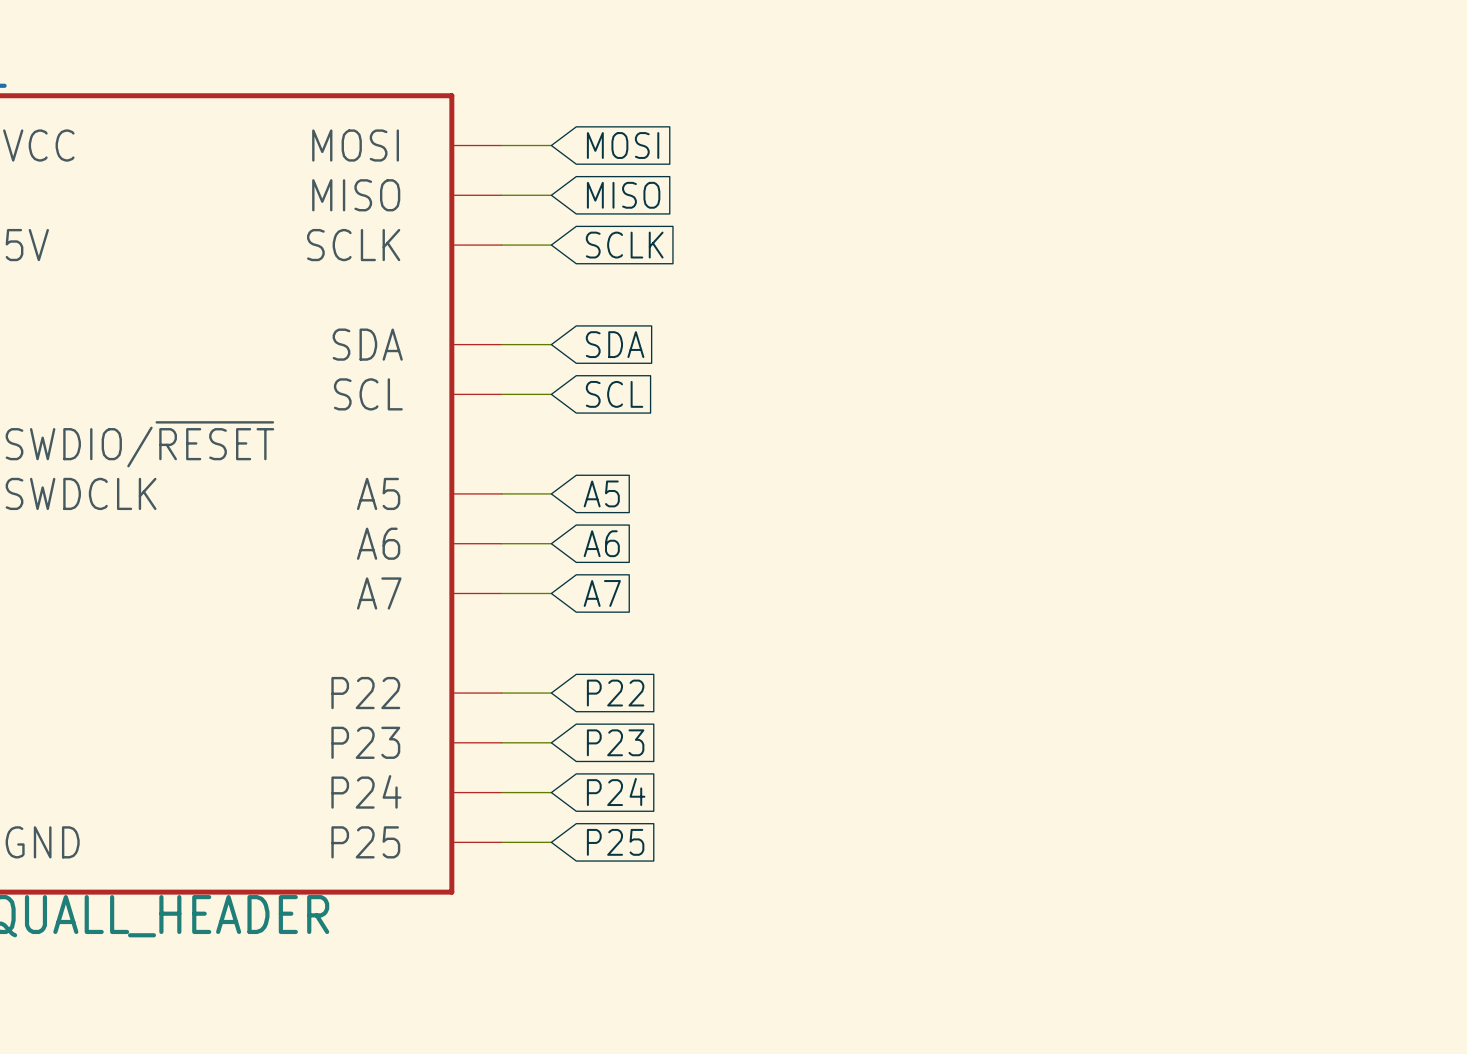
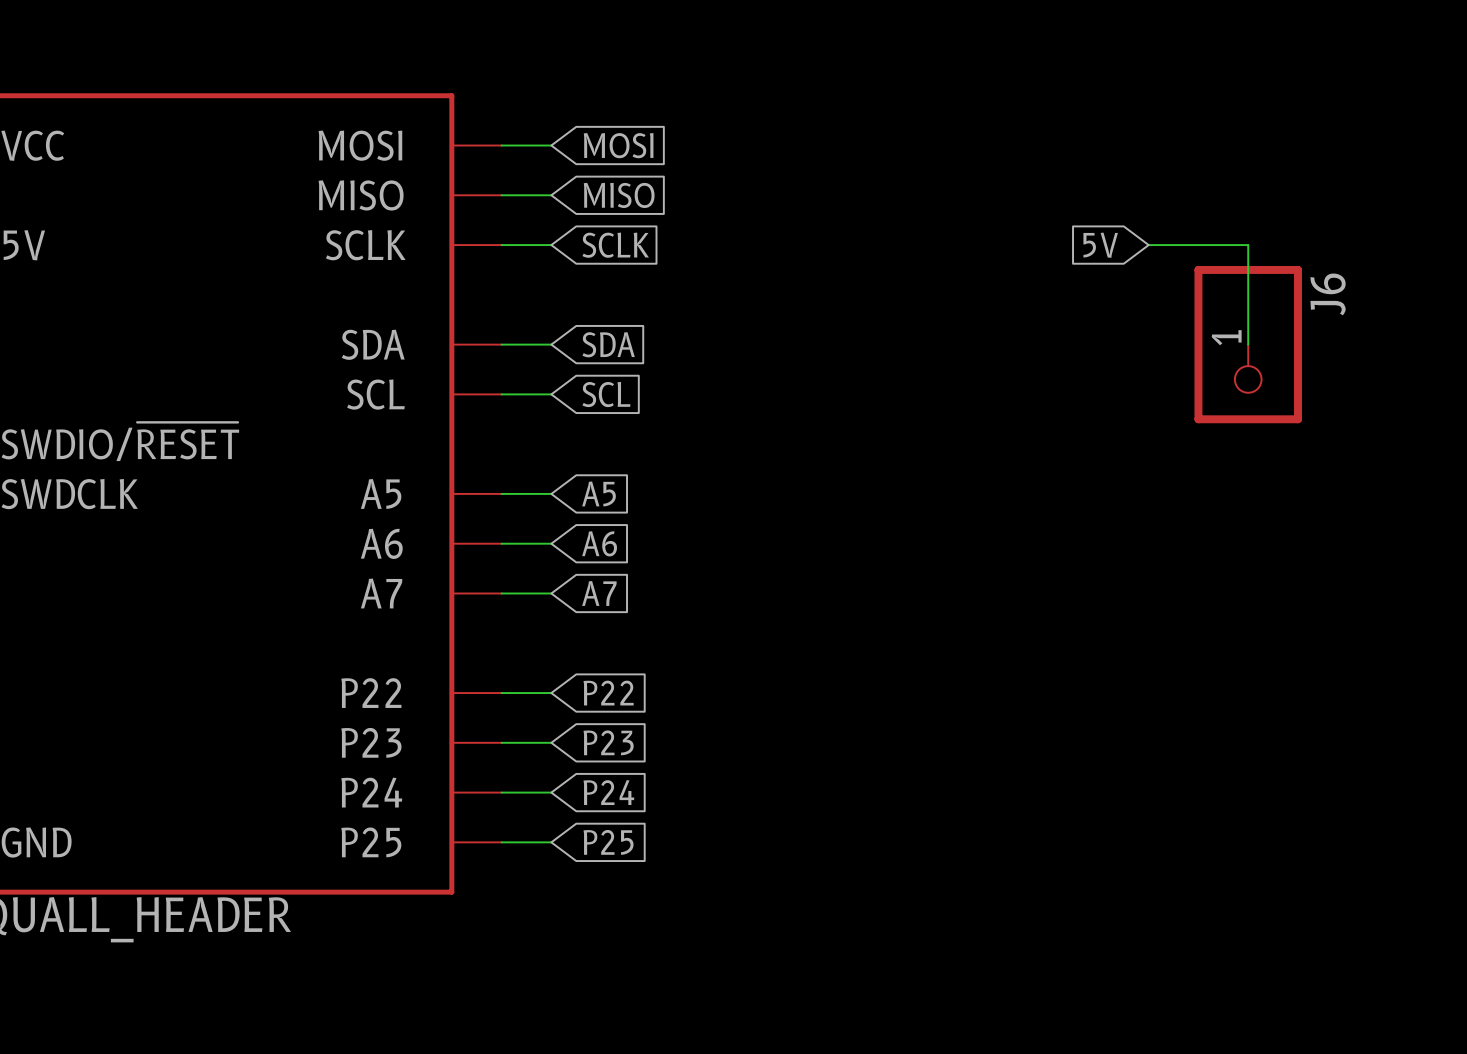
global label: none -> 5V (1100, 245)
wire: none -> (1148, 245) (1248, 245) (1248, 344)
J6: none -> (1248, 344)

